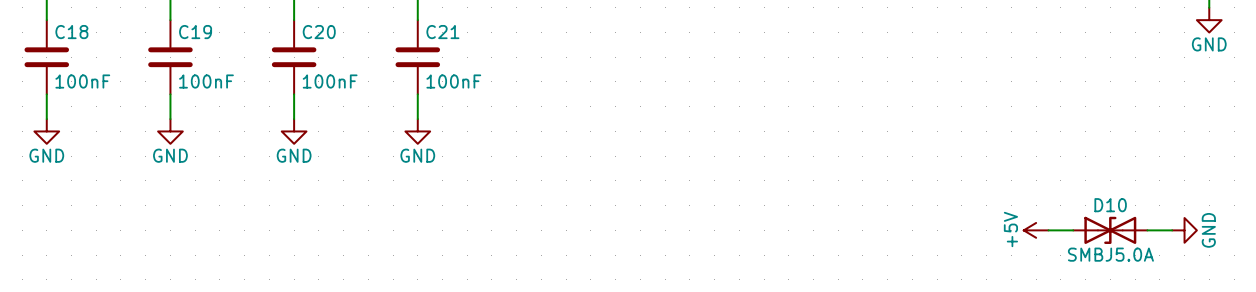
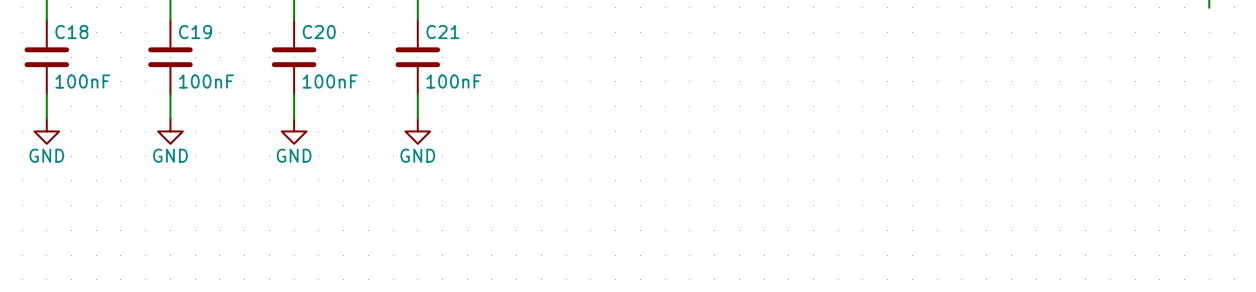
power symbol: GND (1209, 20) -> none
power symbol: +5V (1036, 230) -> none
wire: (1048, 230) (1073, 230) -> none
D10: SMBJ5.0A (1110, 230) -> none
wire: (1147, 230) (1172, 230) -> none
power symbol: GND (1184, 230) -> none

